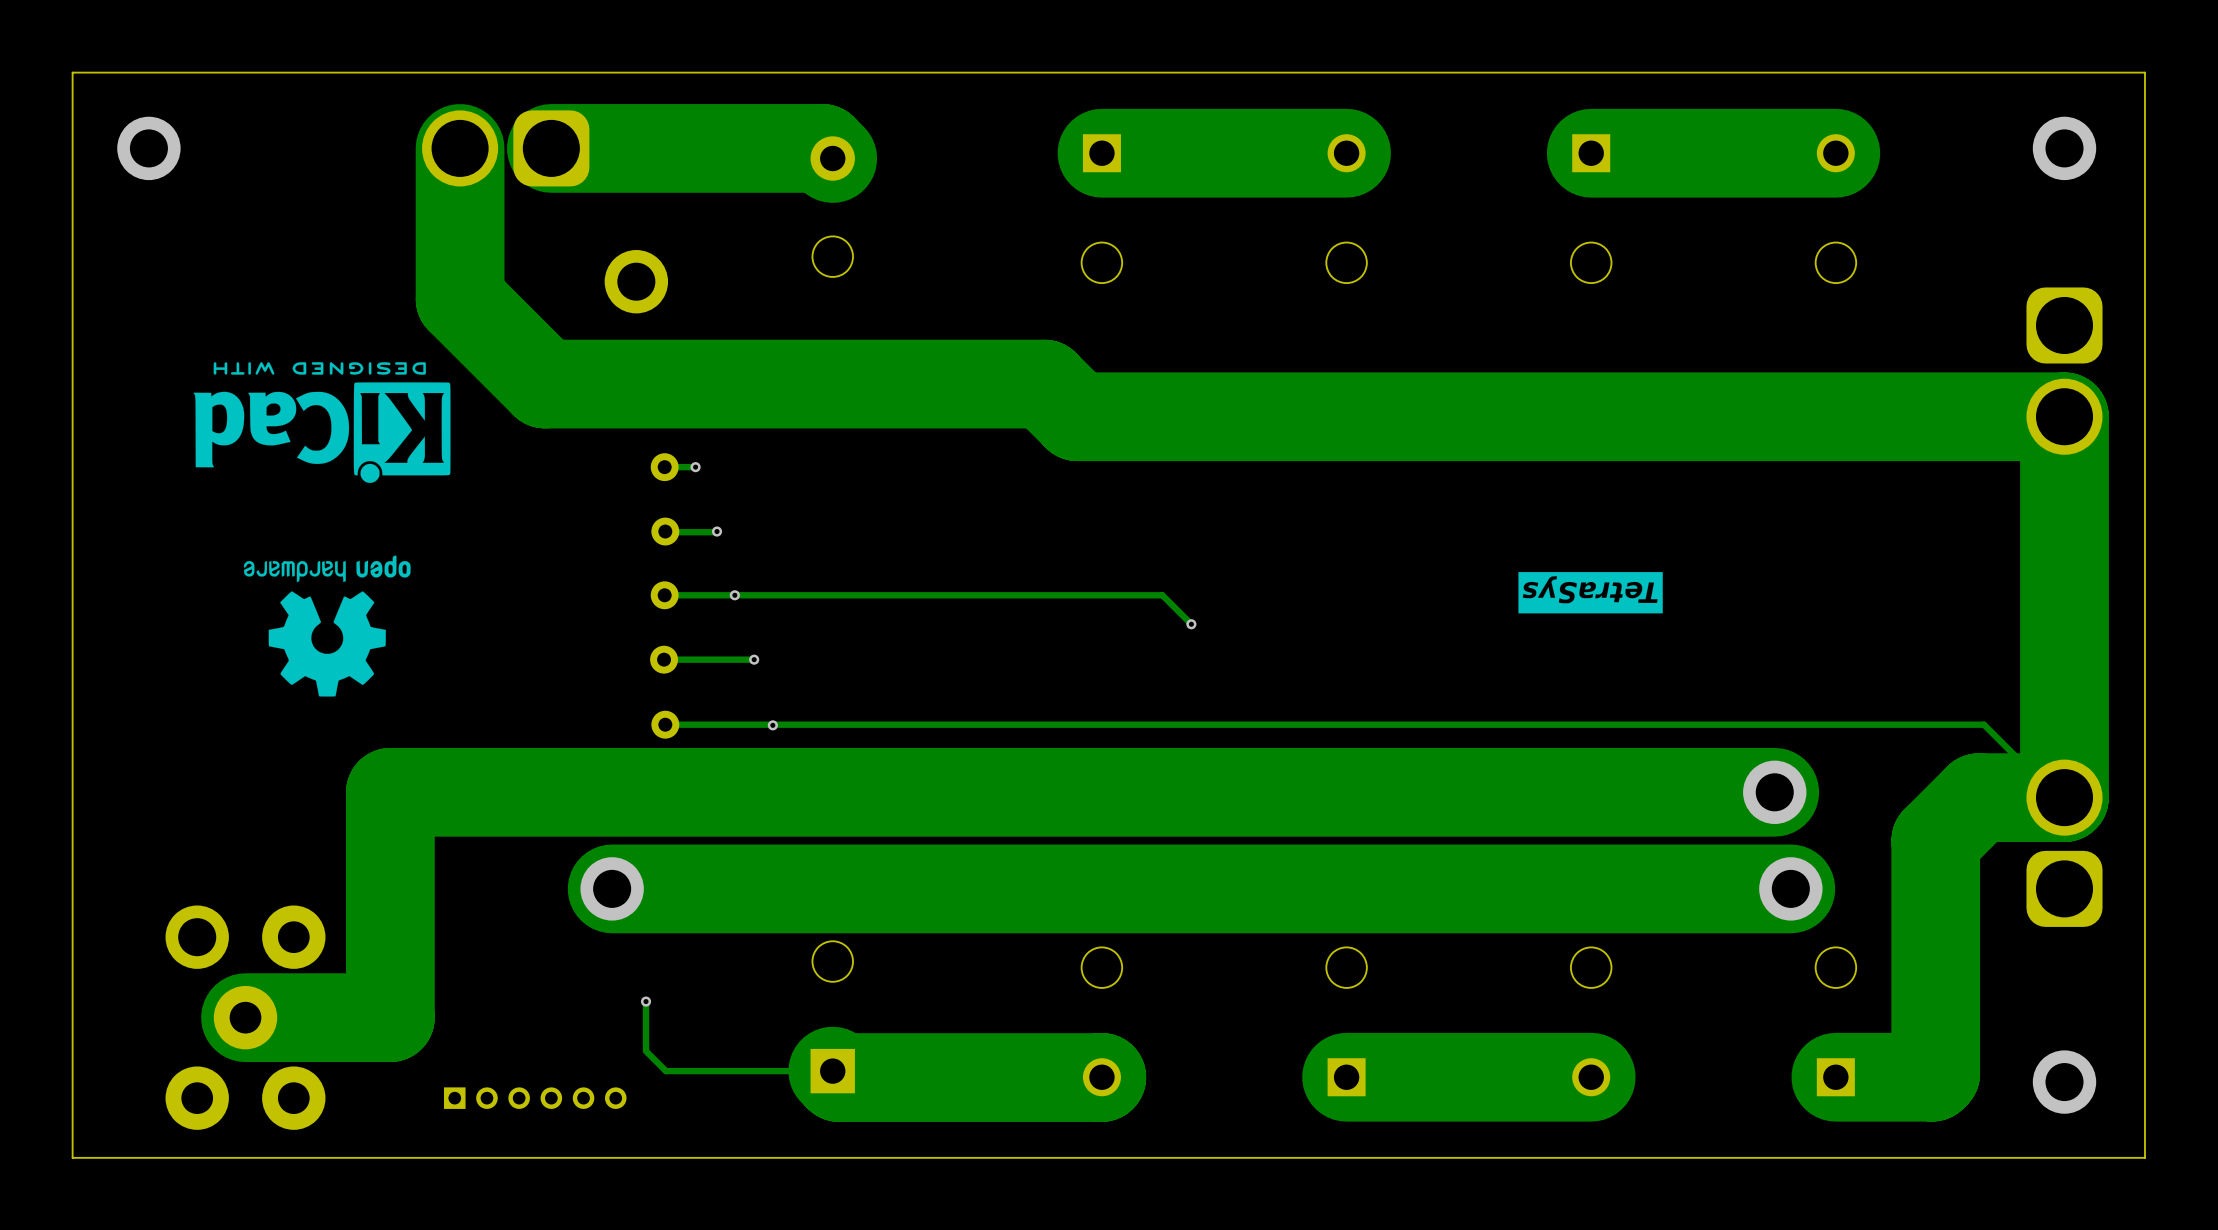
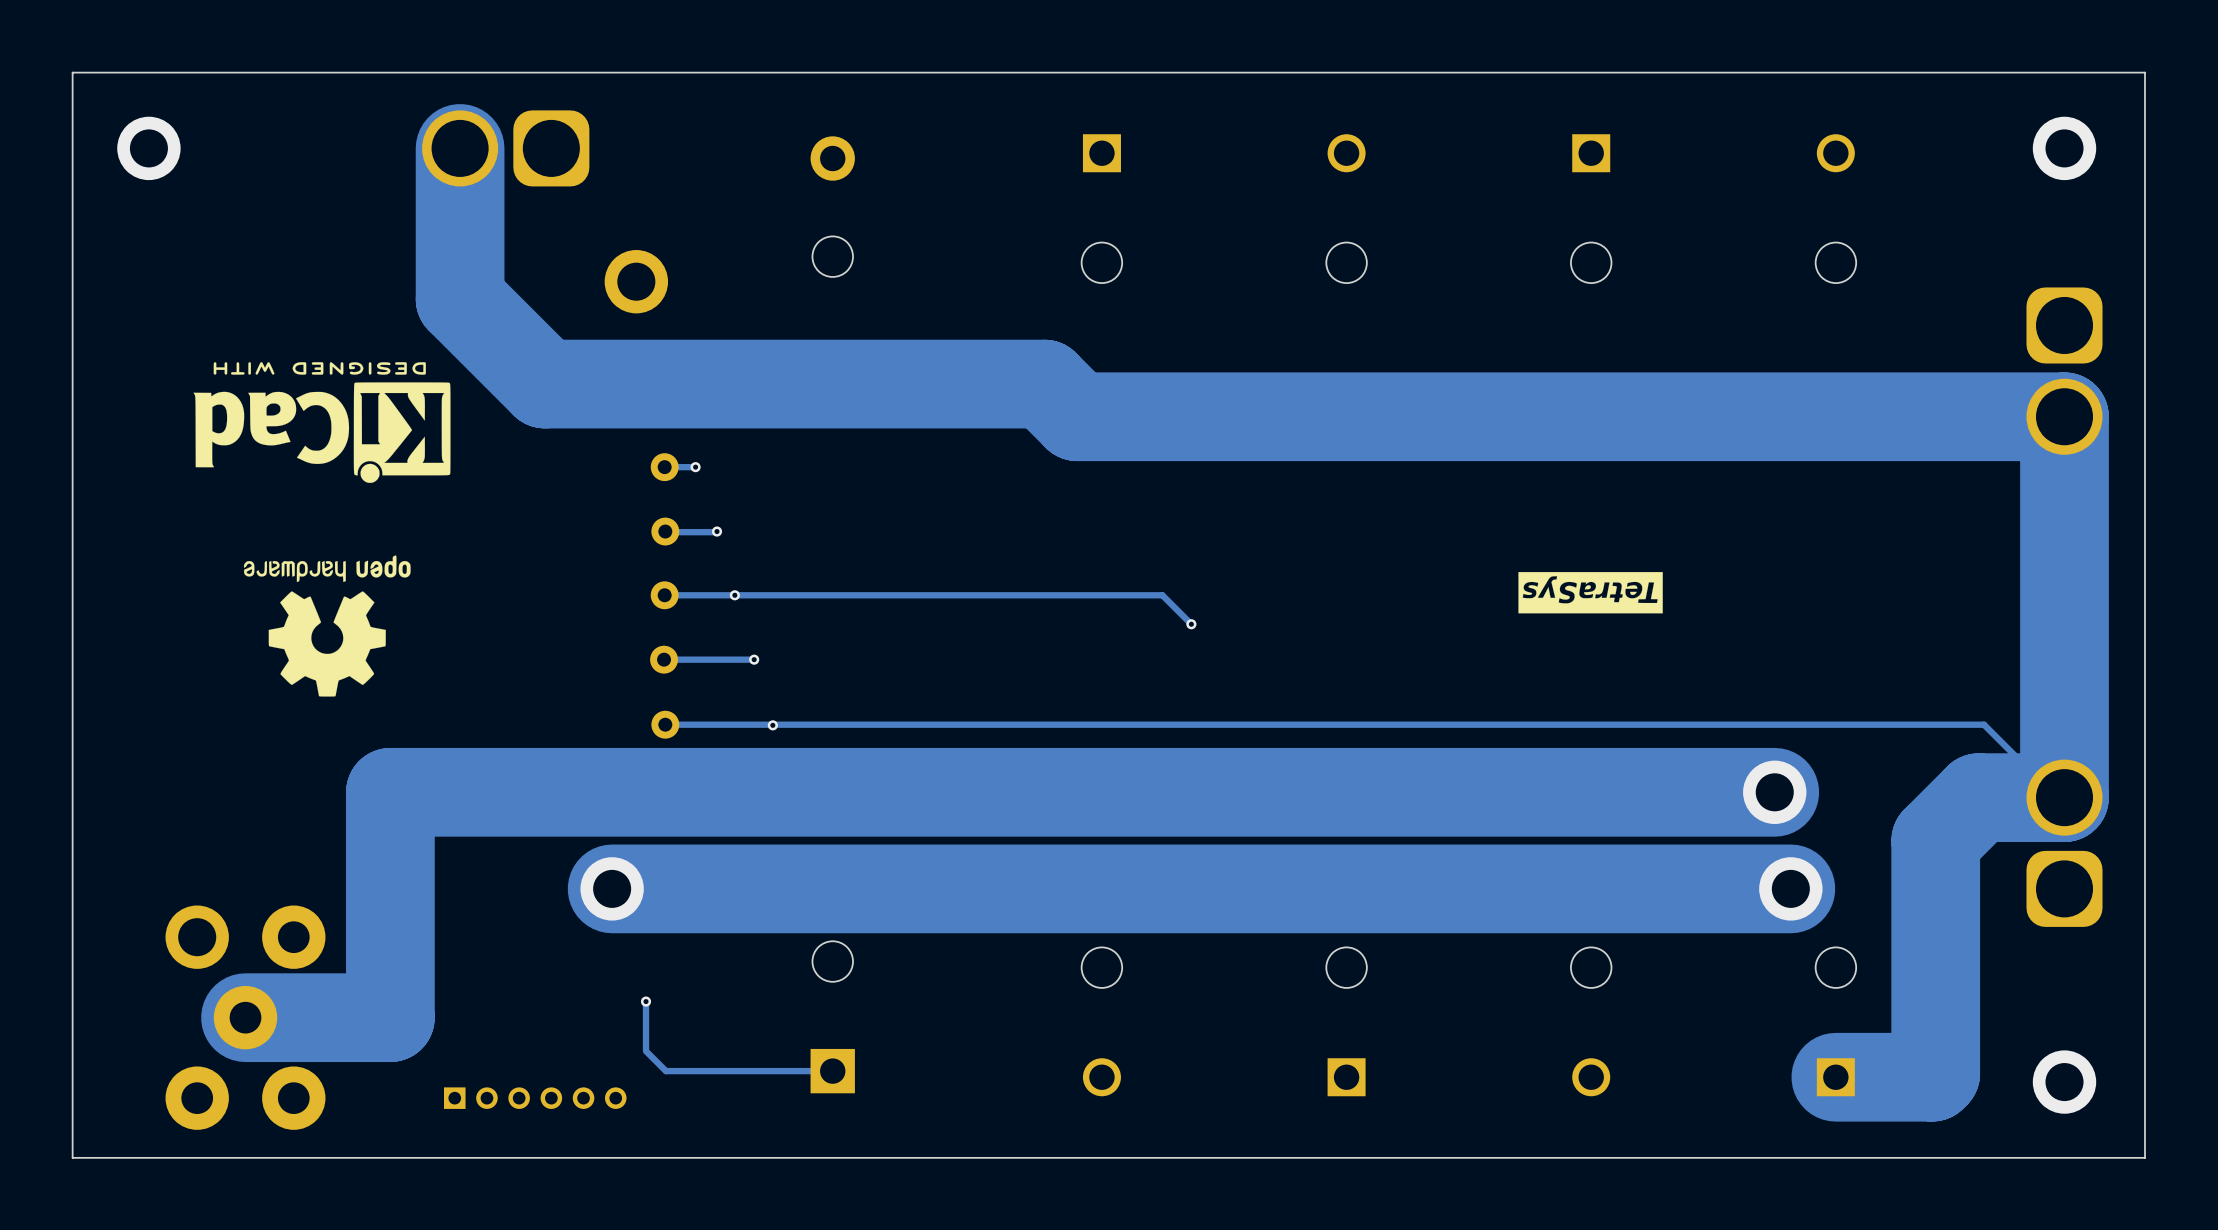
track: (551, 148) (822, 148) (832, 158) -> none
track: (1346, 153) (1101, 153) -> none
track: (1835, 153) (1591, 153) -> none
track: (832, 1071) (839, 1077) (1101, 1077) -> none
track: (1591, 1077) (1346, 1077) -> none

